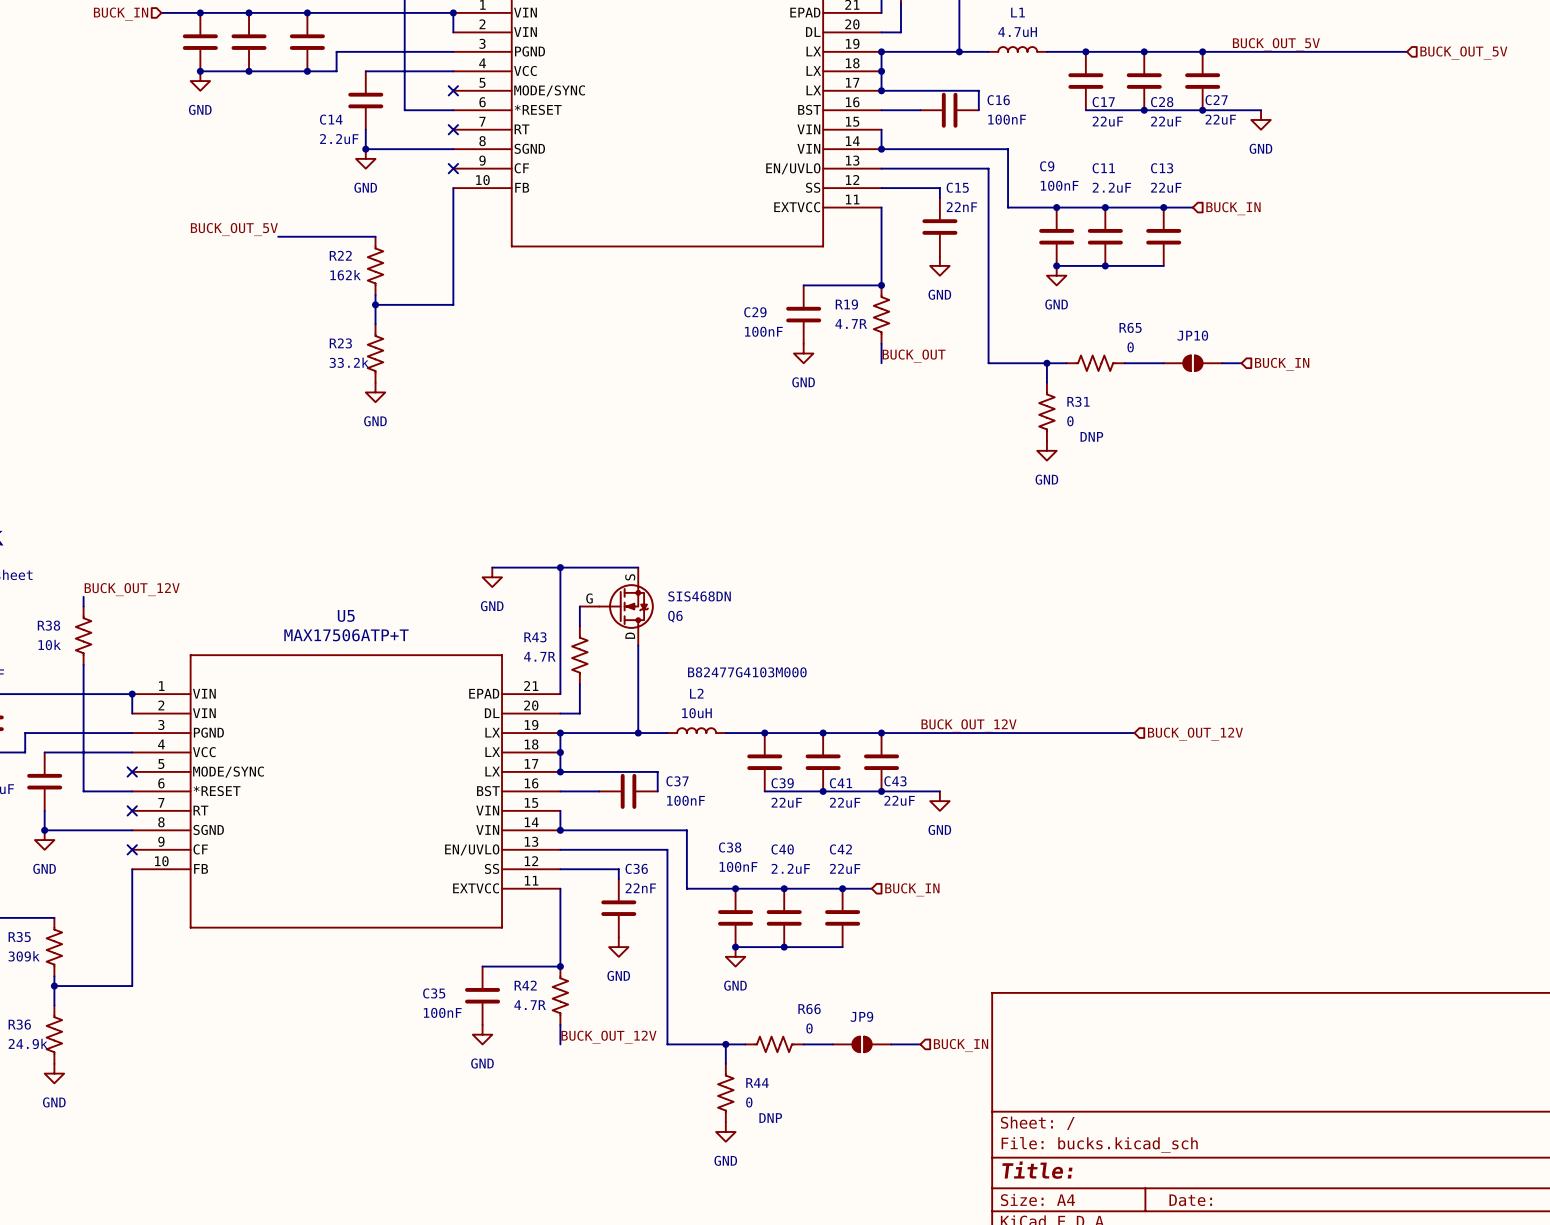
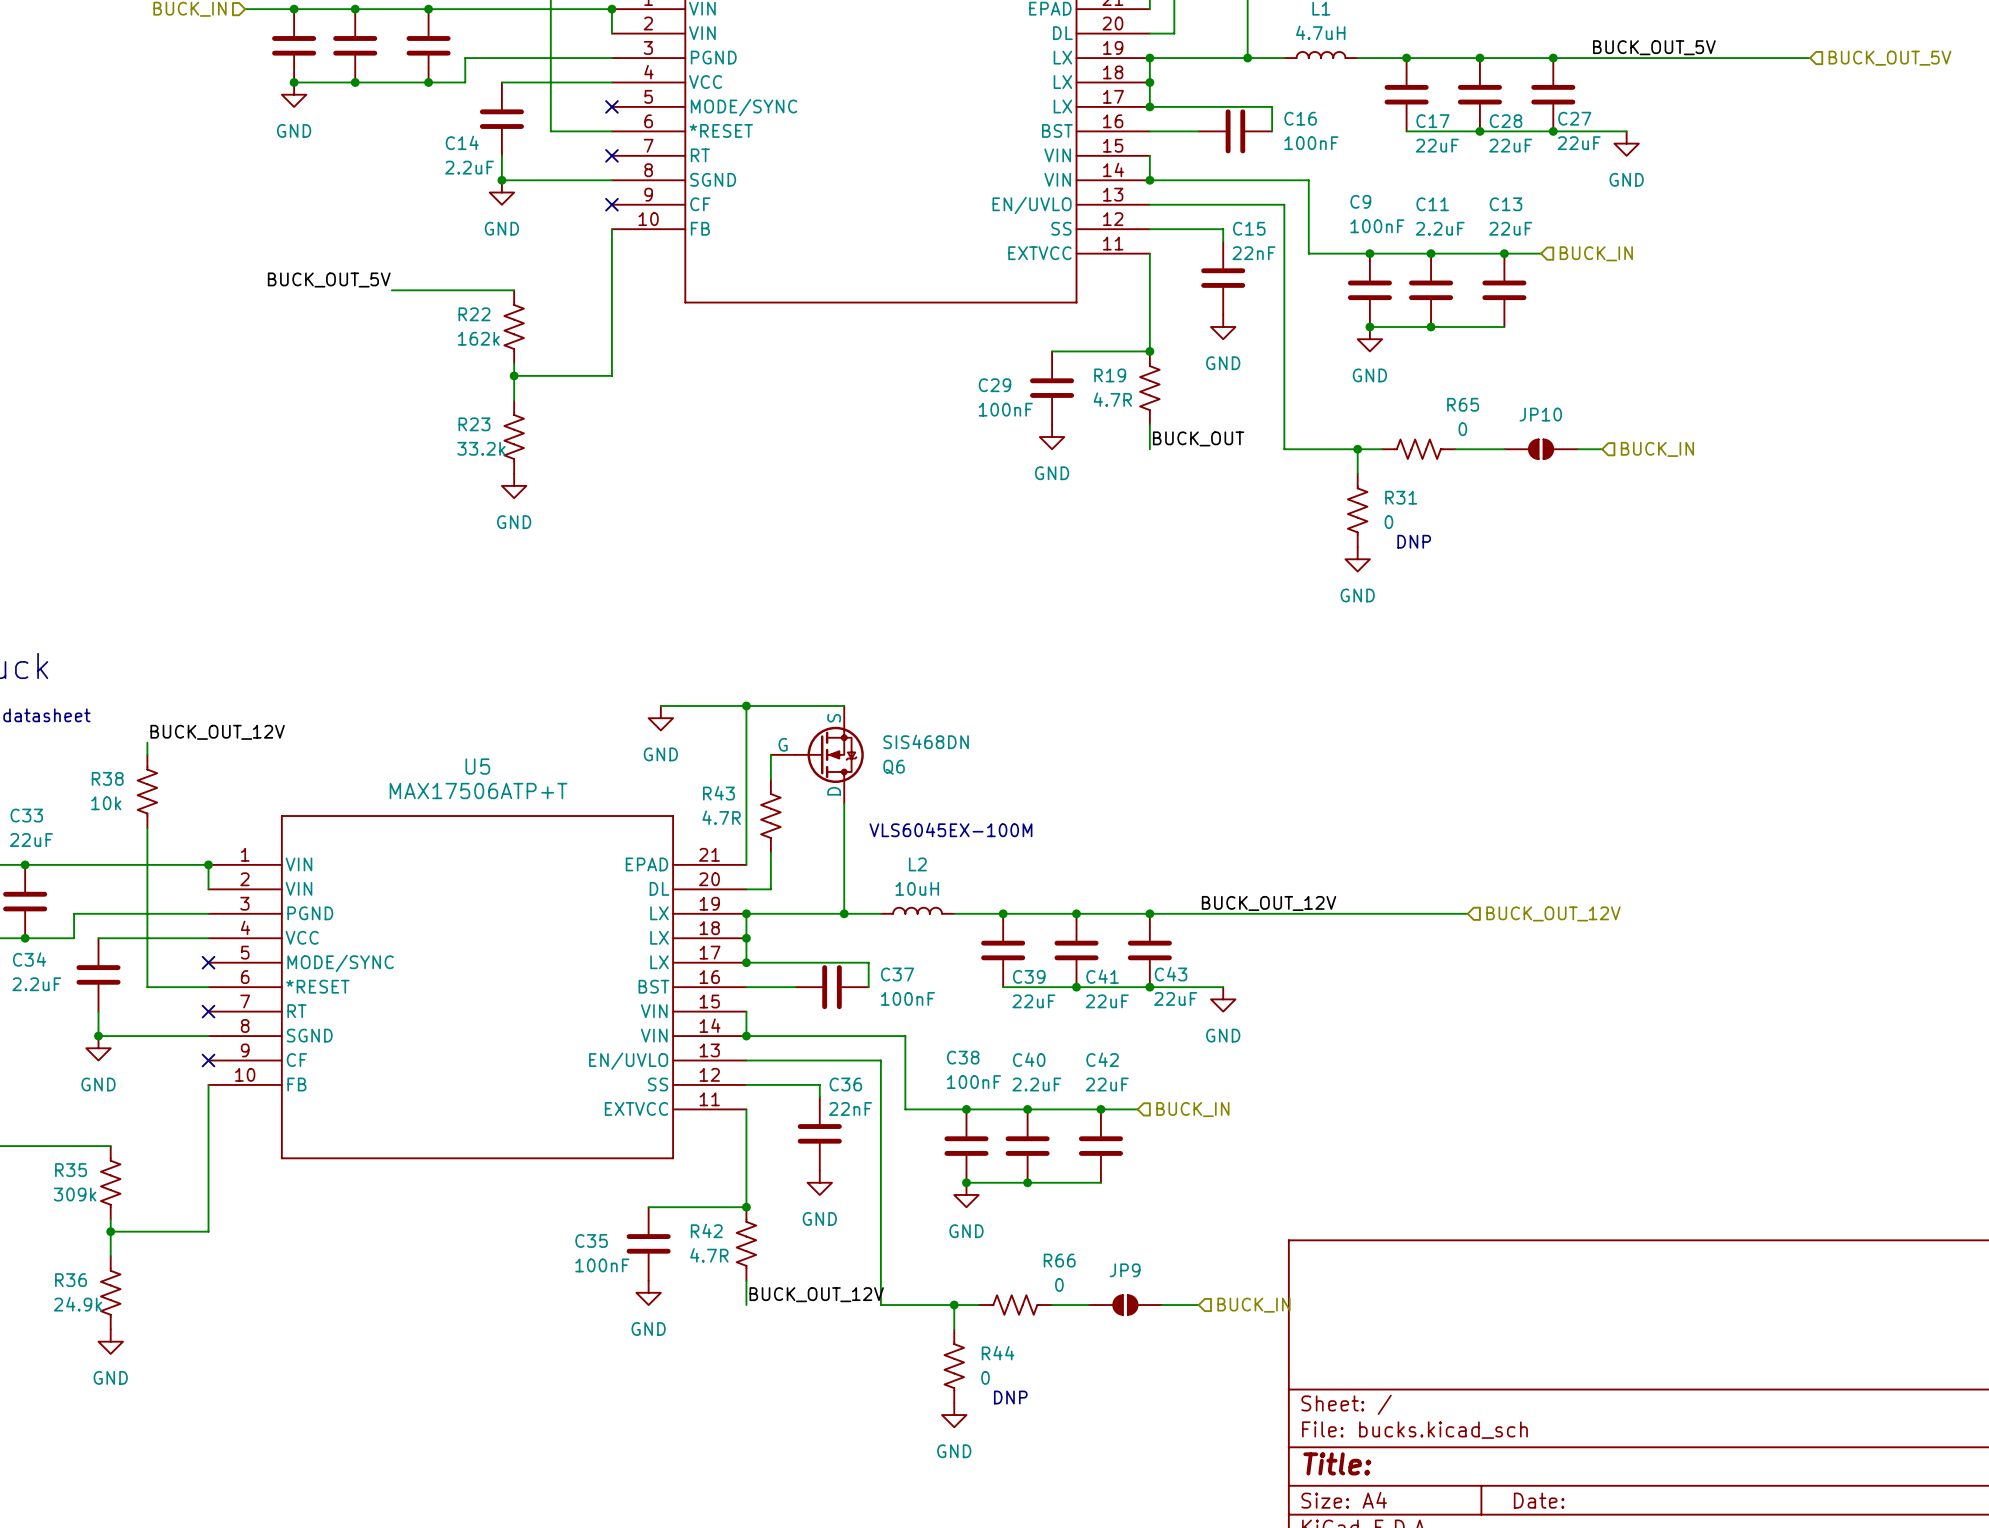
text: none -> VLS6045EX-100M (950, 829)
text: B82477G4103M000 (747, 672) -> none

